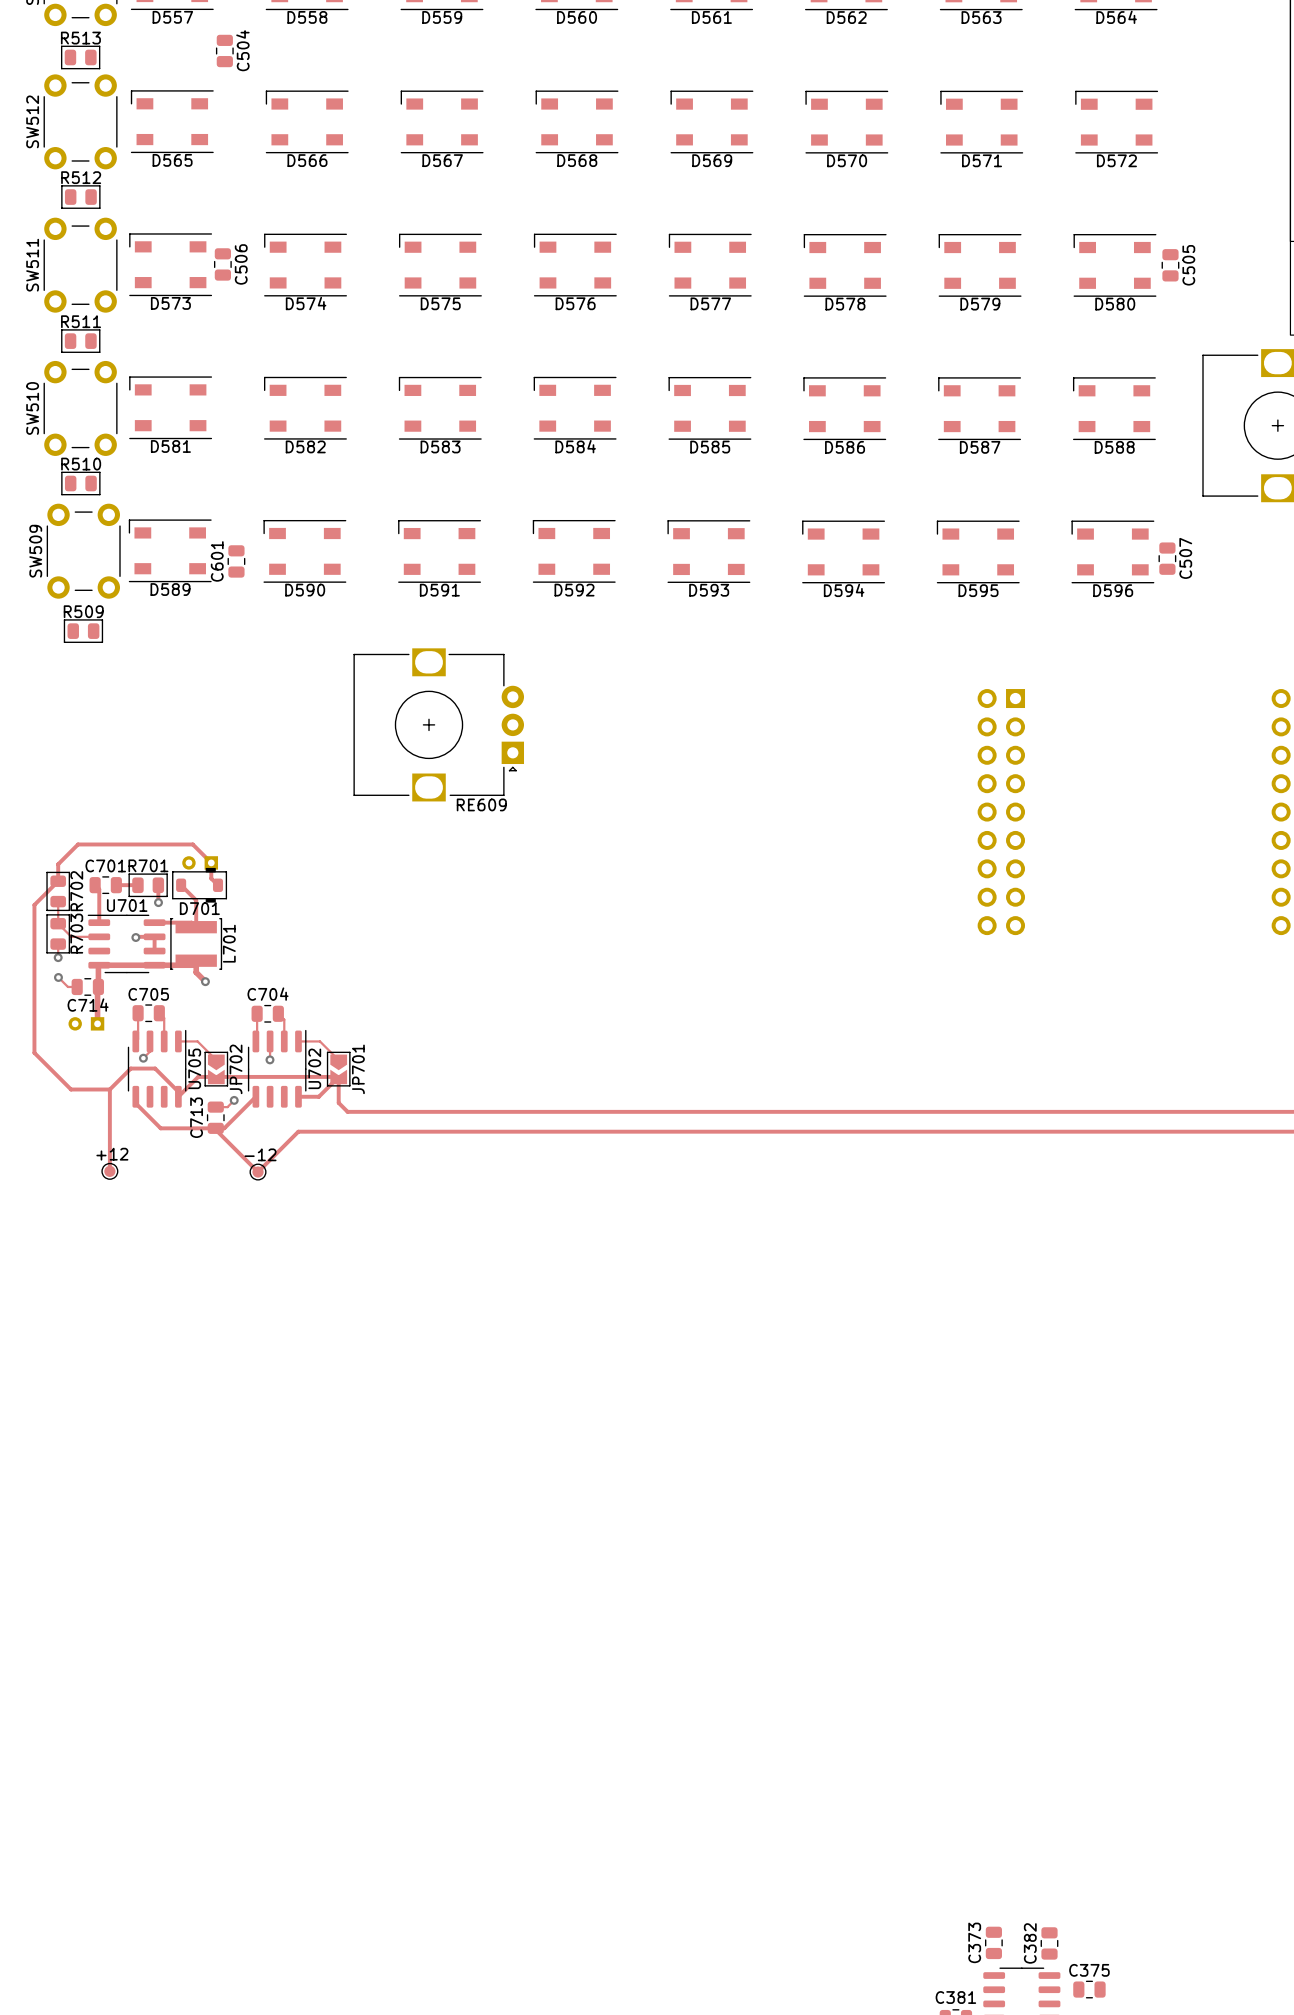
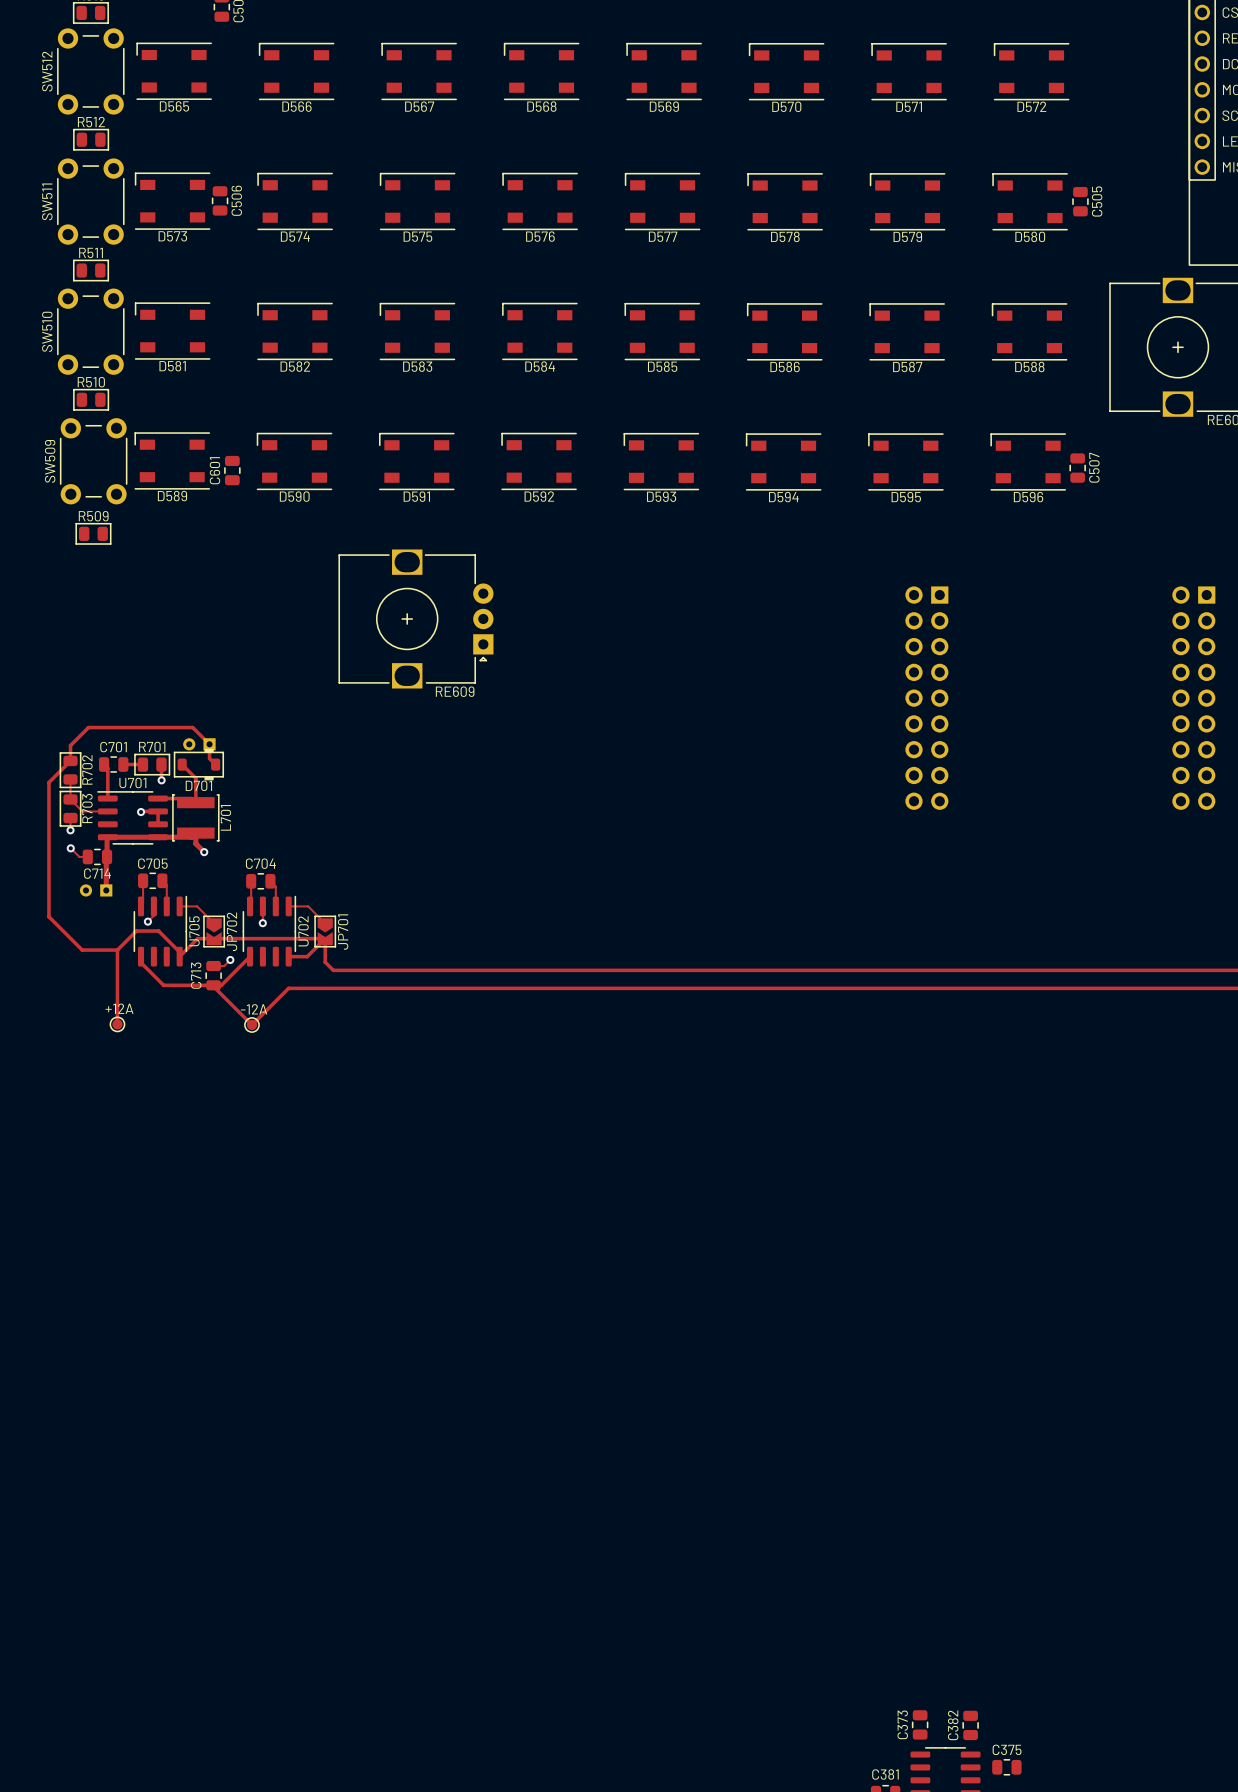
part value: +12 (112, 1154) -> +12A (119, 1008)
part value: -12 (260, 1154) -> -12A (254, 1009)

